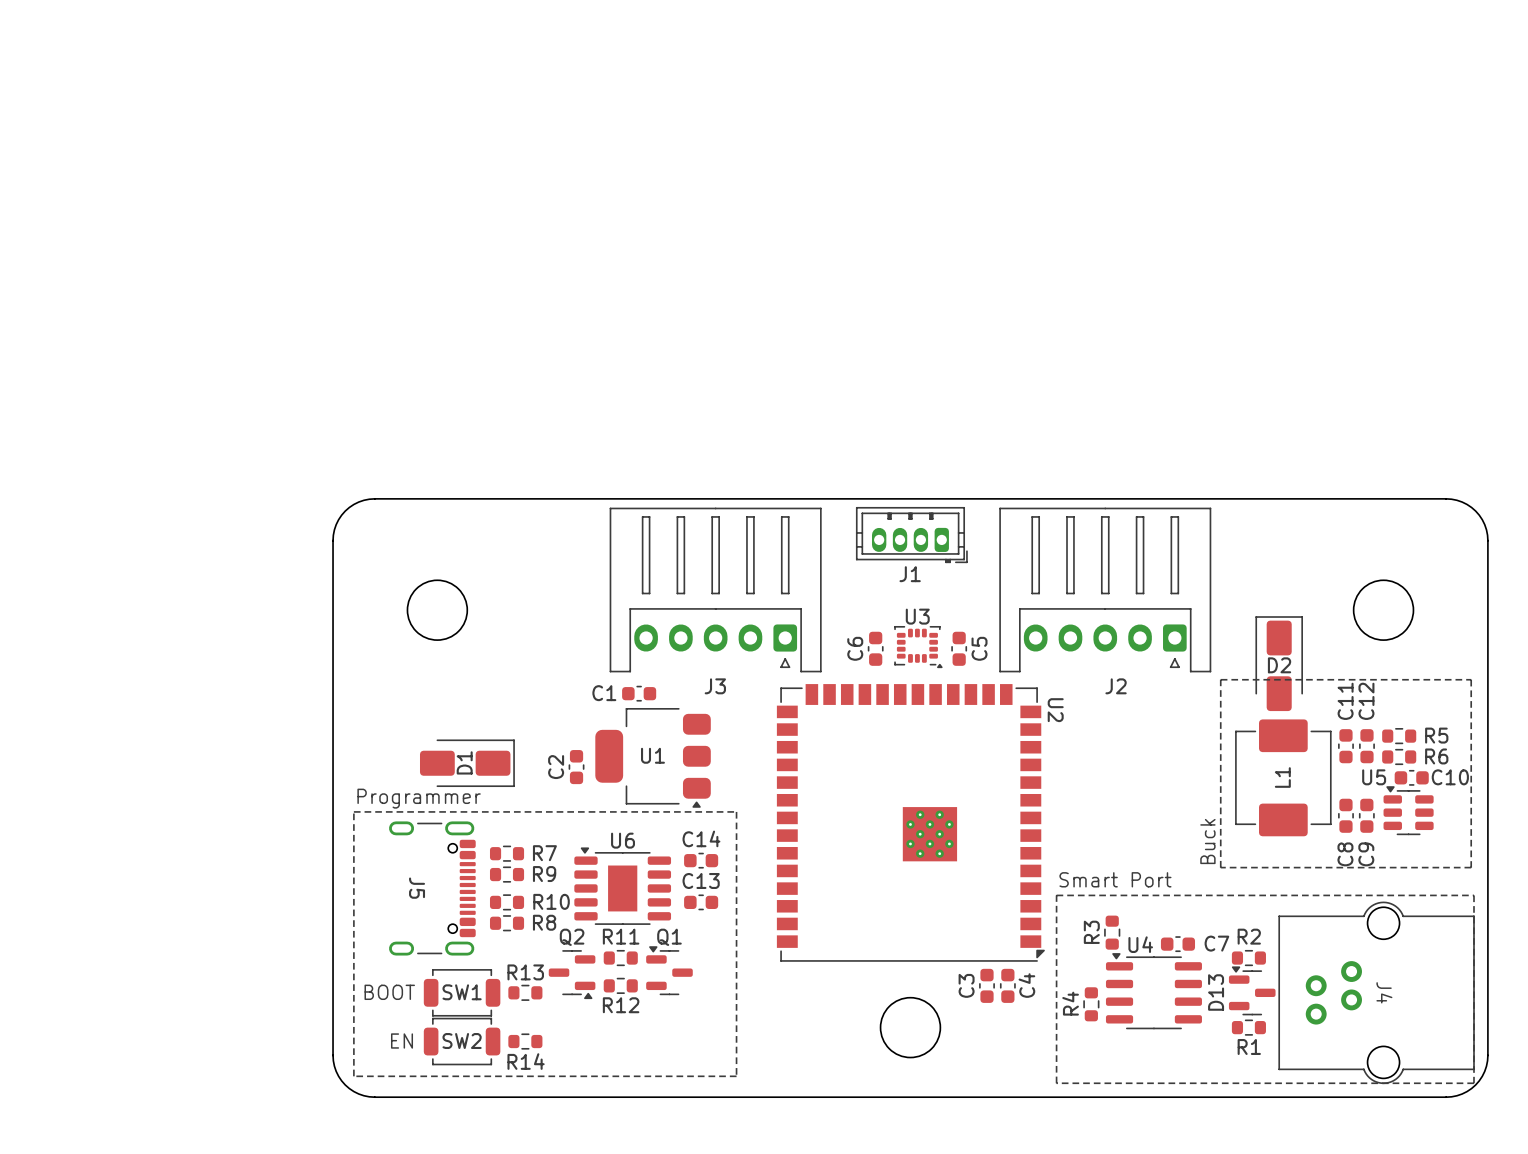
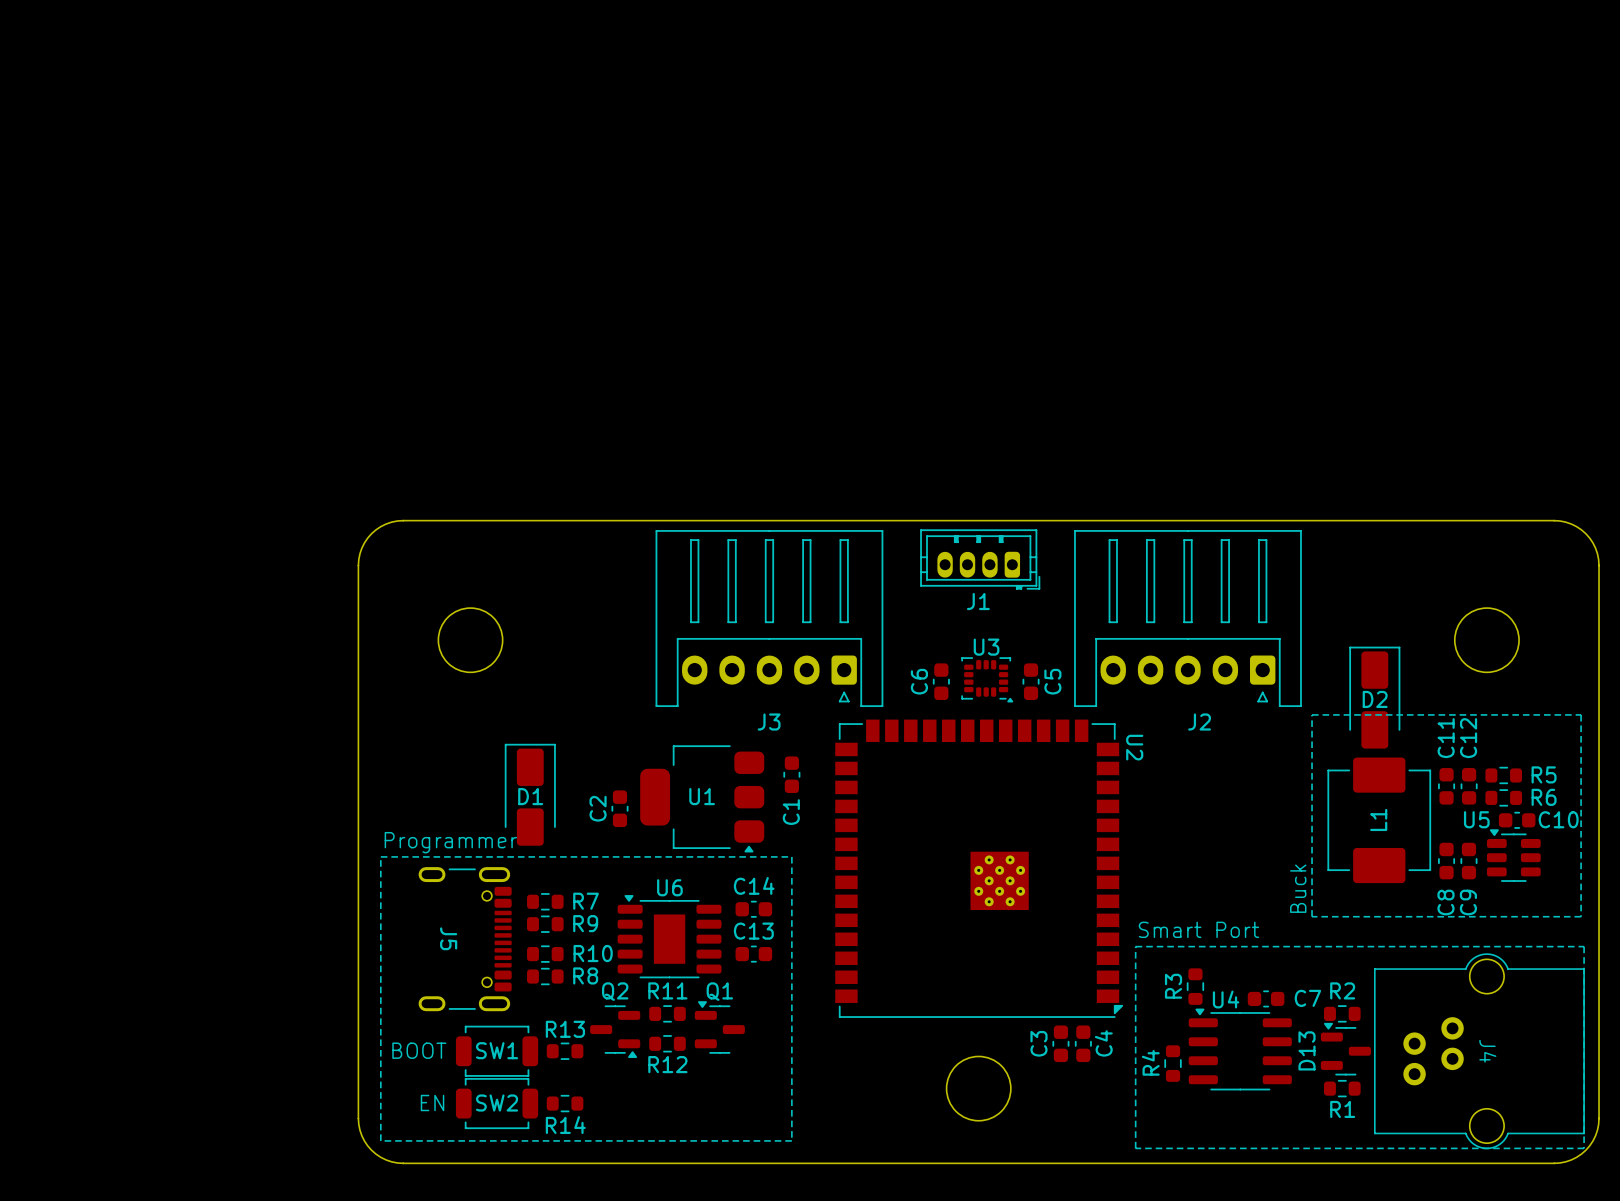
C1 name position: C1 (604, 693) -> C1 (791, 812)
C1 rotation: 0° (639, 693) -> 90° clockwise (791, 774)
C1 position: (639, 693) -> (791, 774)
D1 rotation: 0° (467, 763) -> 90° counterclockwise (530, 794)

